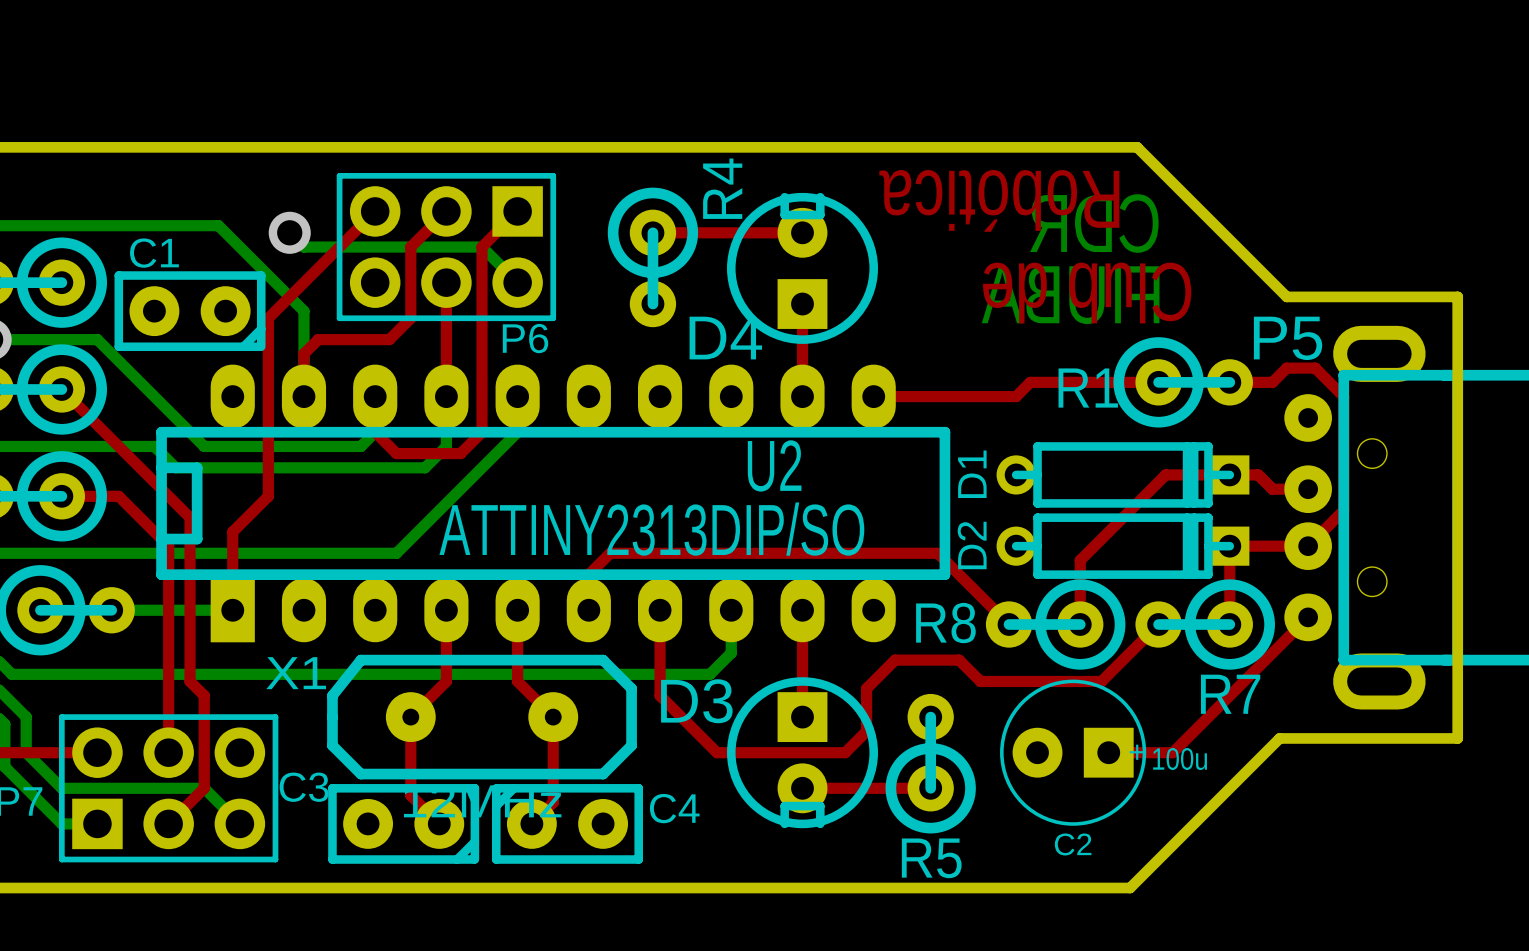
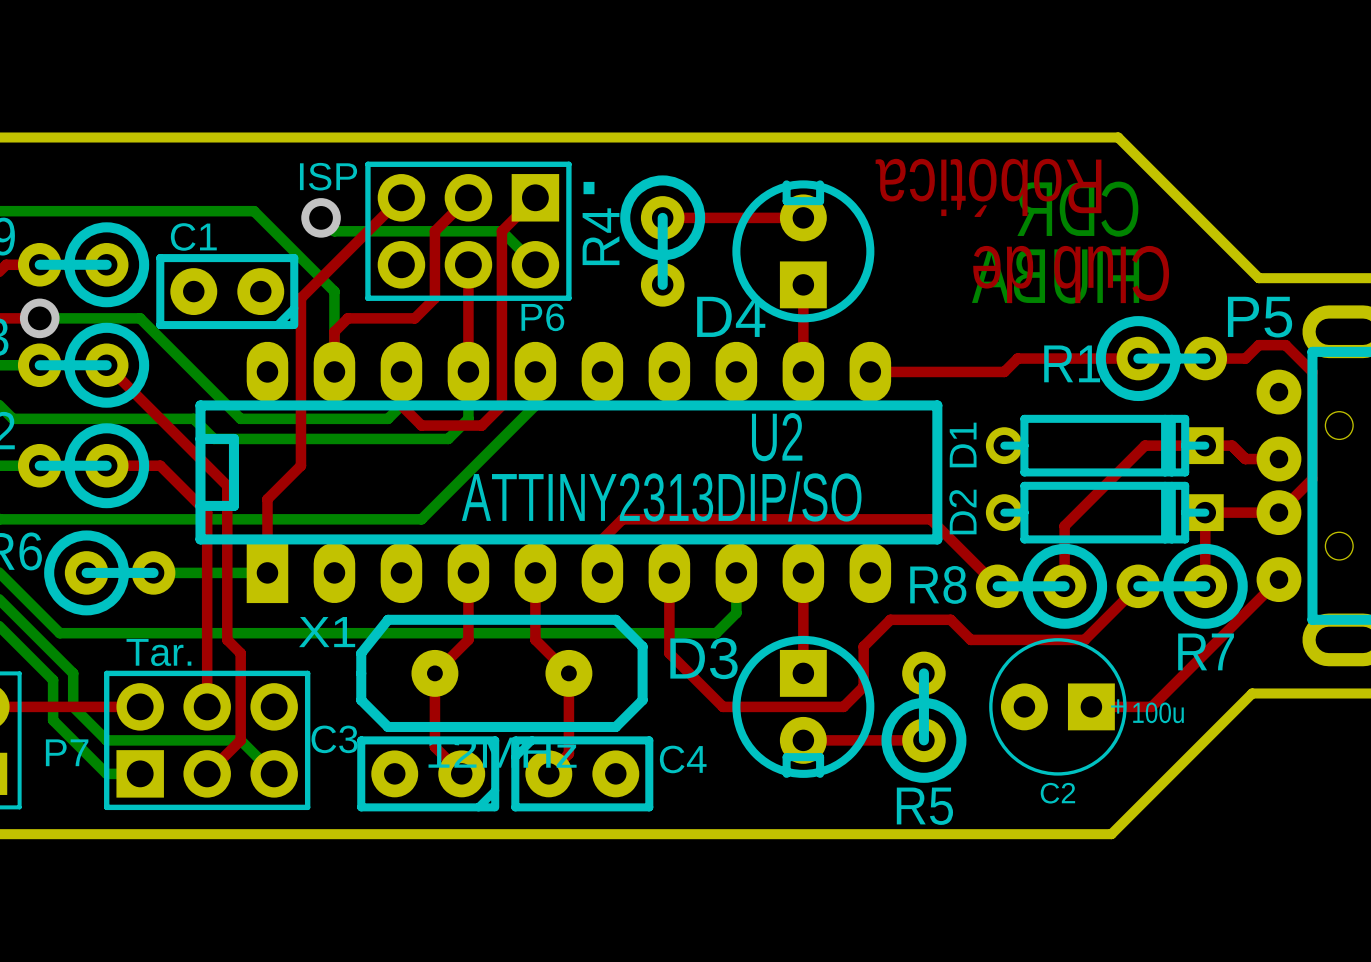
R4 name position: R4 (722, 188) -> R4 (601, 236)
P6 value: none -> ISP (328, 176)
text: none -> . (589, 188)
P7 value: none -> Tar. (158, 652)

